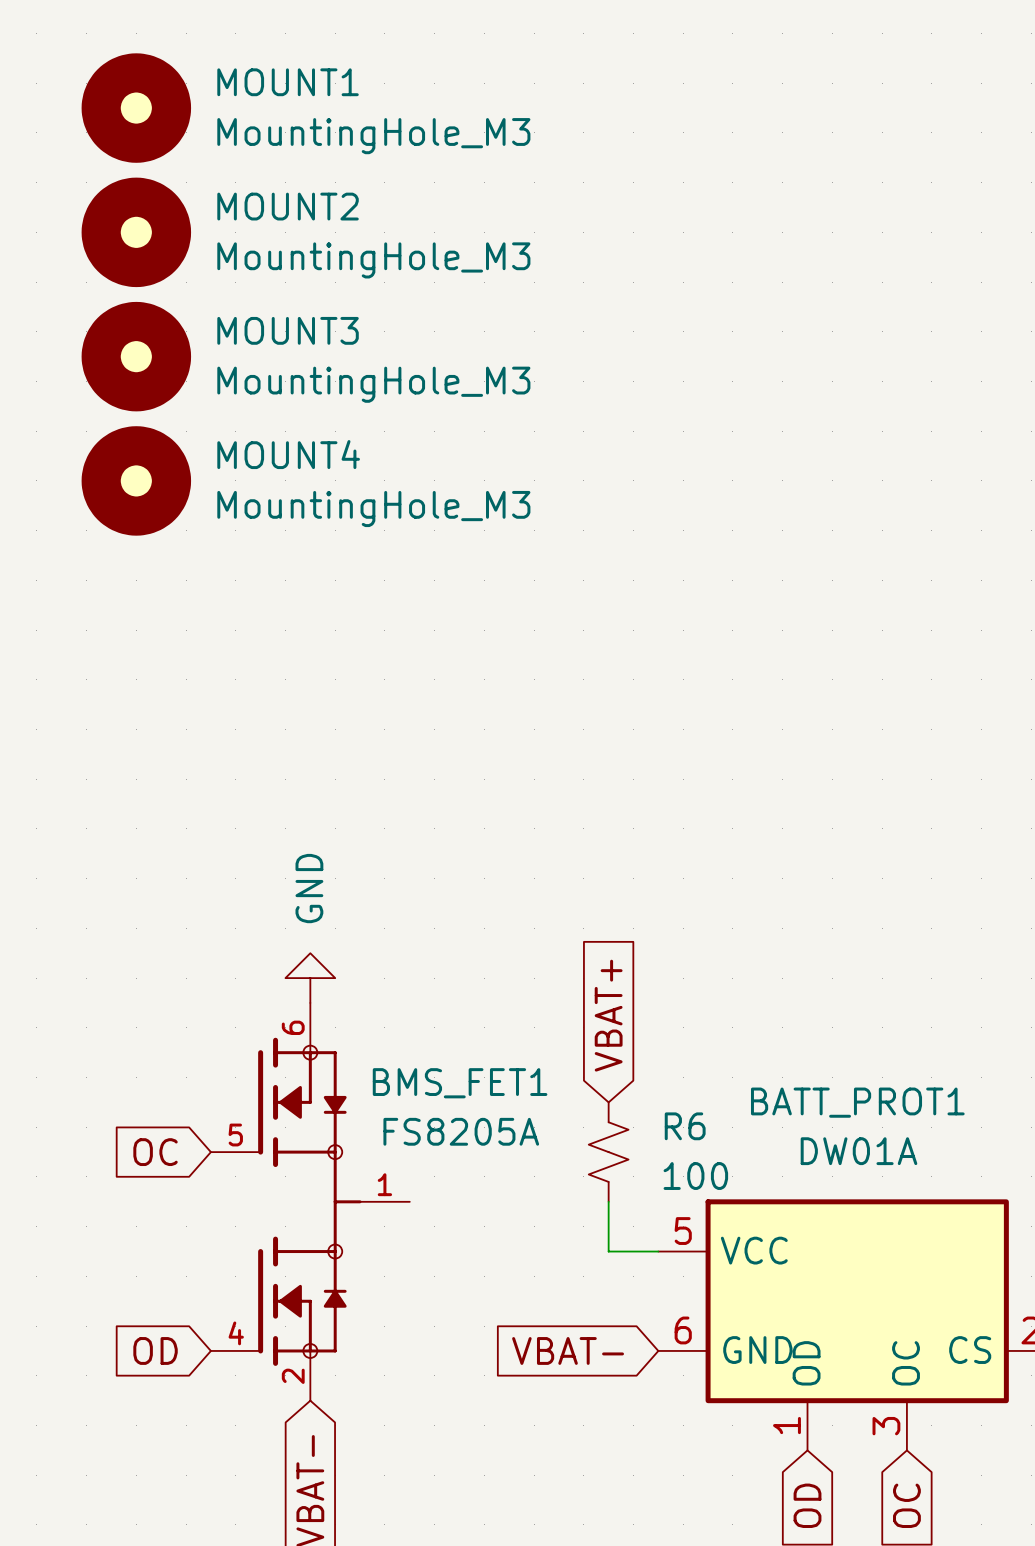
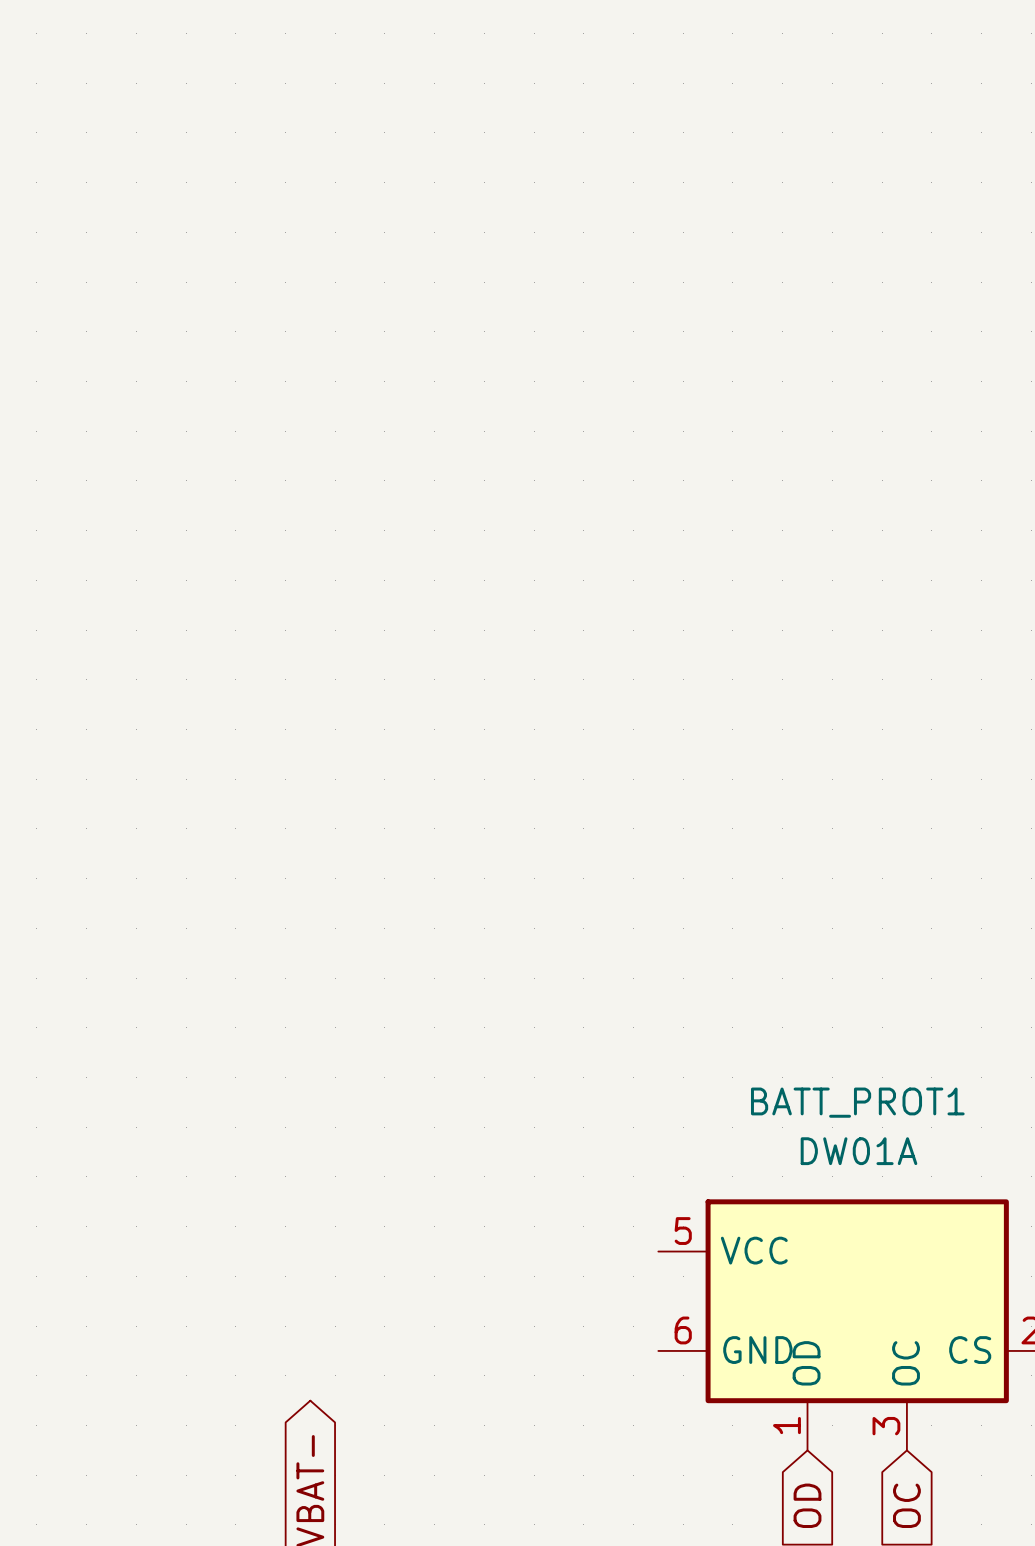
MOUNT1: MountingHole_M3 (136, 108) -> none
MOUNT2: MountingHole_M3 (136, 232) -> none
MOUNT3: MountingHole_M3 (136, 356) -> none
MOUNT4: MountingHole_M3 (136, 480) -> none
power symbol: GND (310, 978) -> none
global label: VBAT+ (608, 1015) -> none
global label: OC (155, 1152) -> none
R6: 100 (608, 1152) -> none
BMS_FET1: FS8205A (310, 1201) -> none
wire: (608, 1201) (608, 1251) (658, 1251) -> none
global label: OD (155, 1350) -> none
global label: VBAT- (568, 1350) -> none

